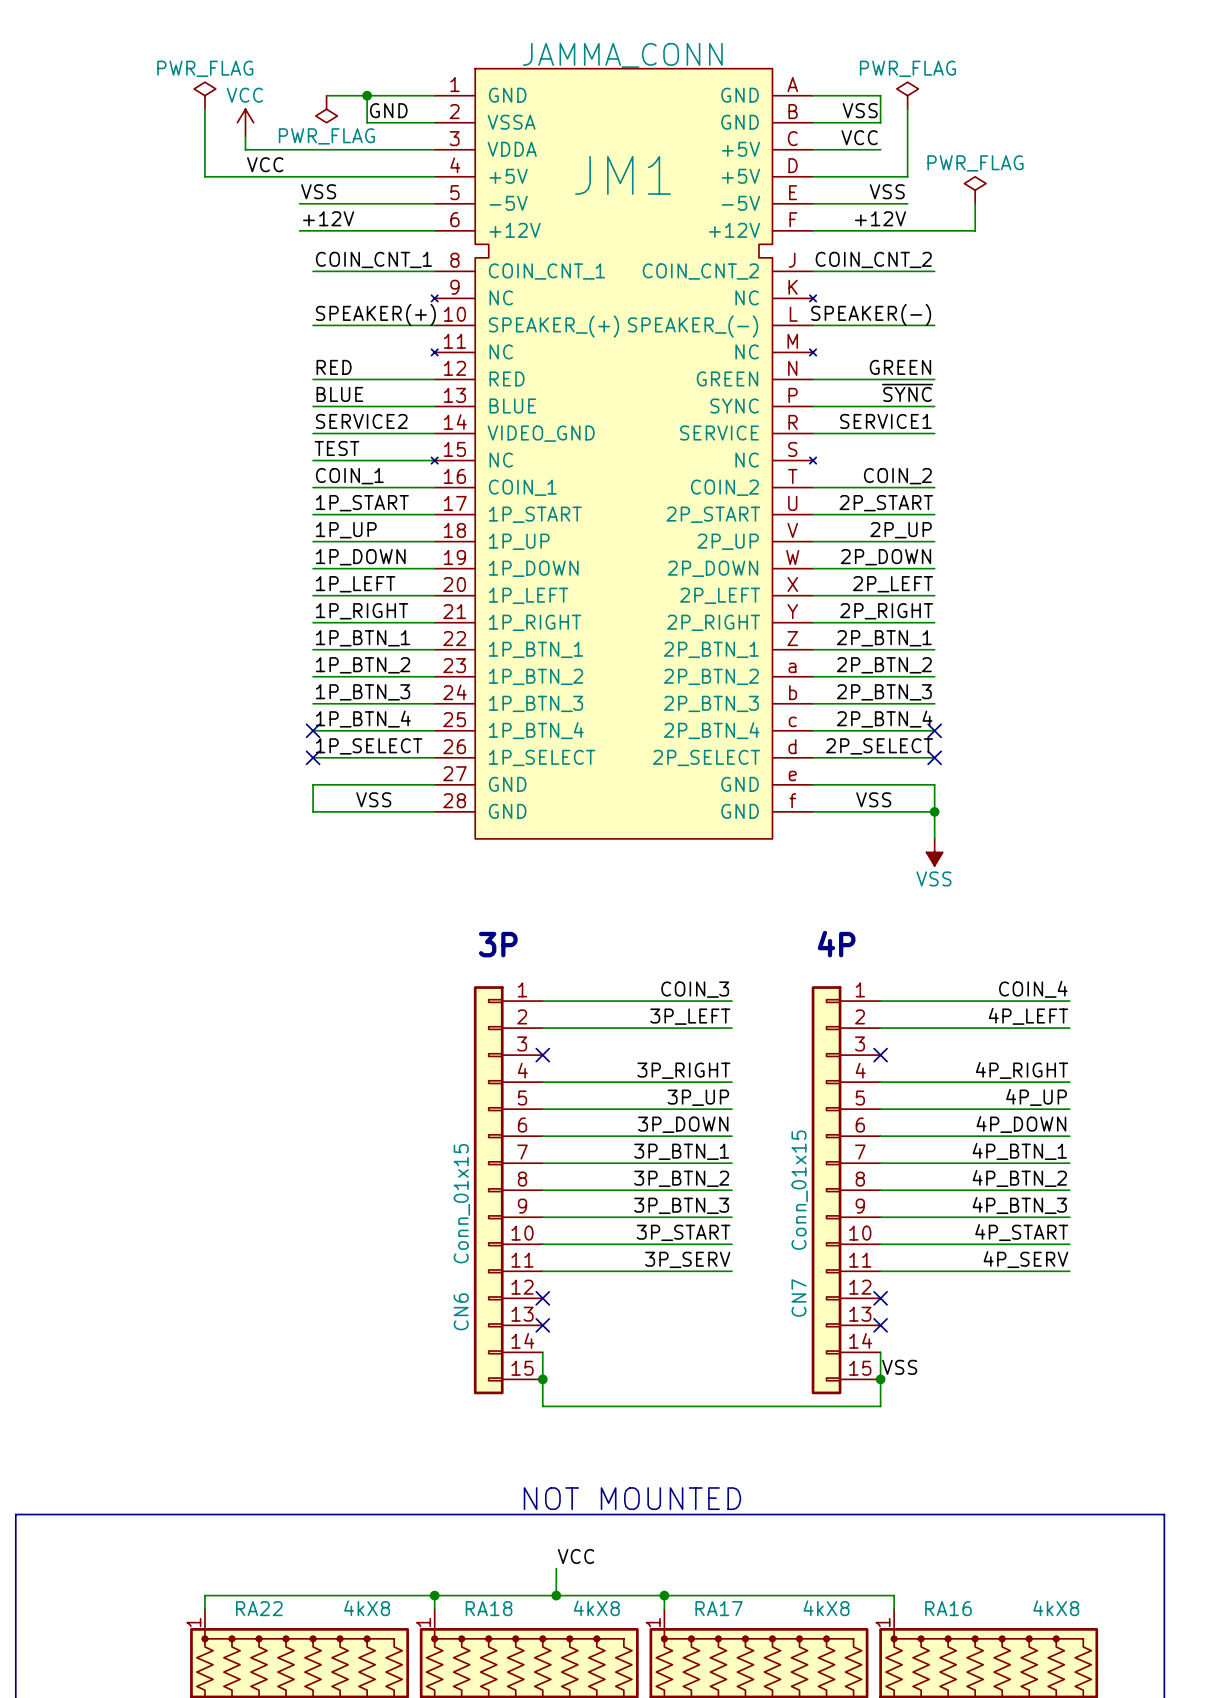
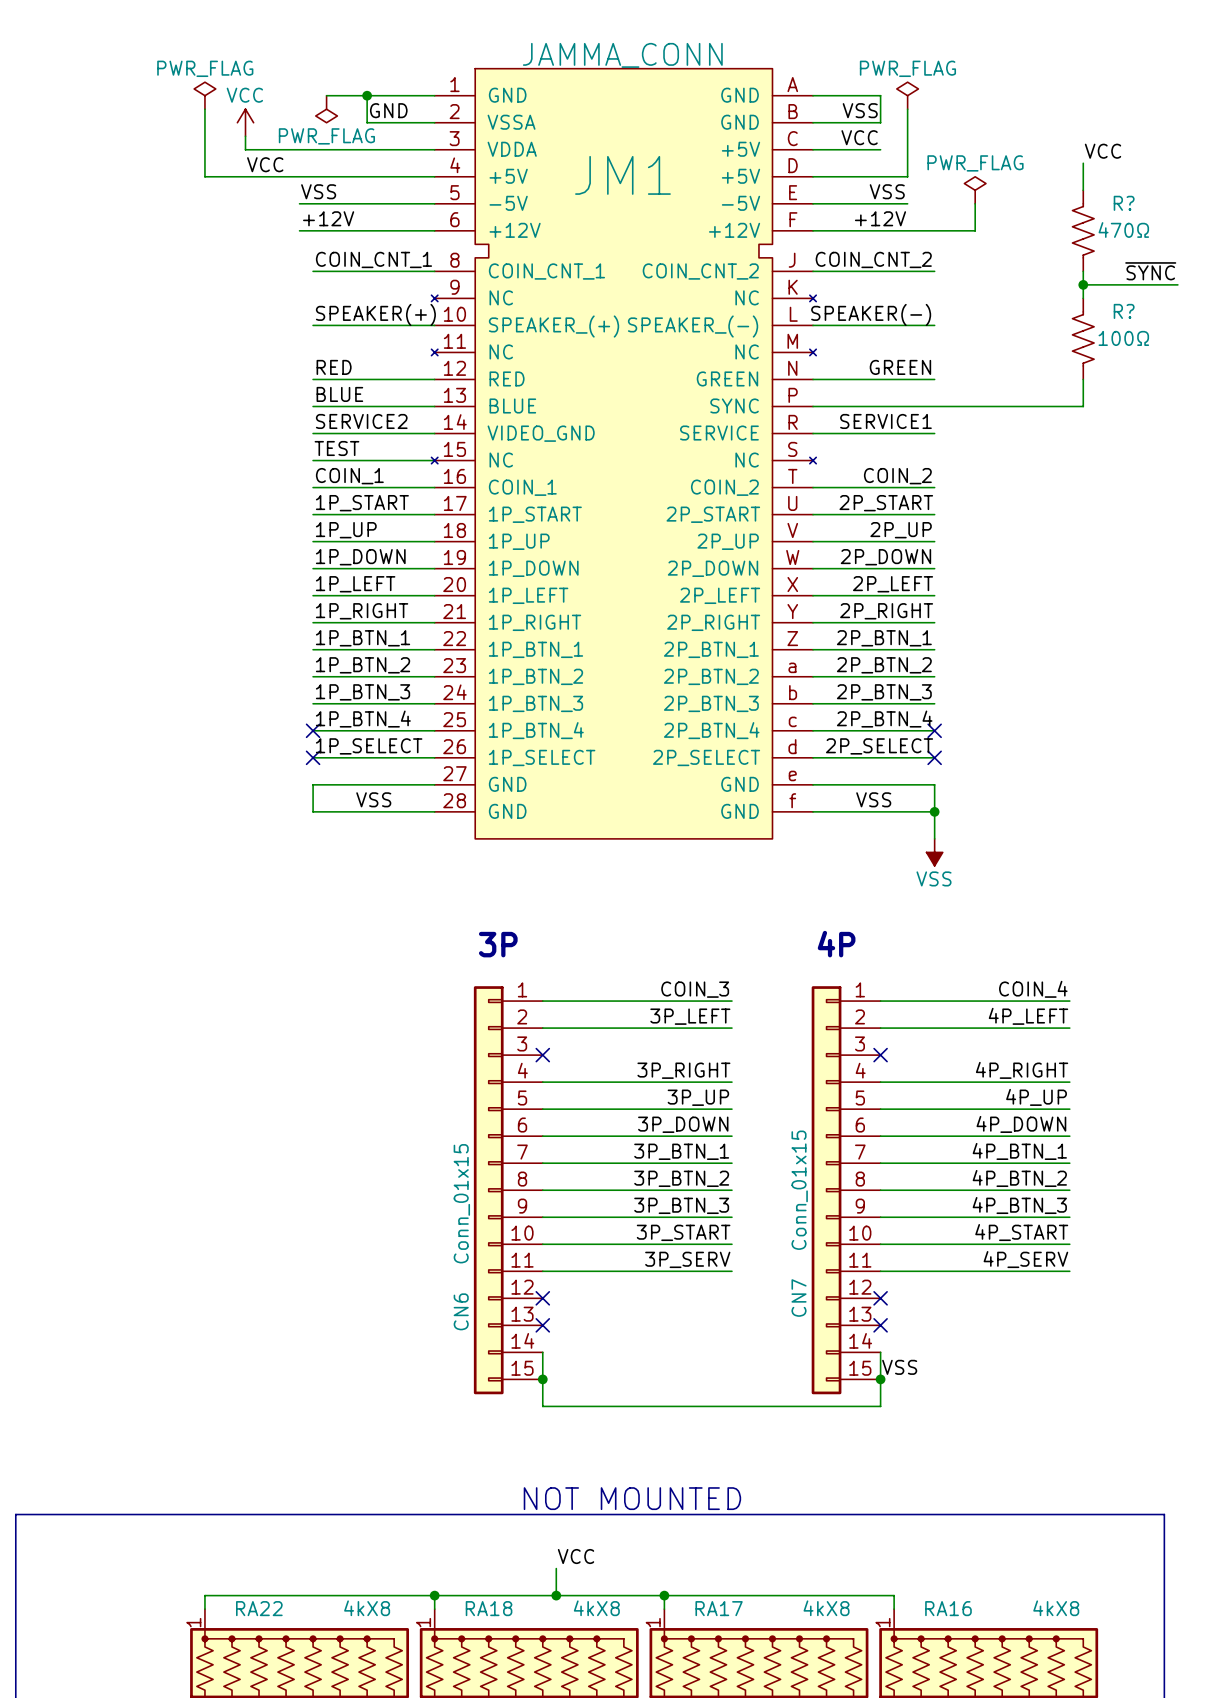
label: none -> VCC (1103, 151)
wire: none -> (1083, 163) (1083, 190)
R?: none -> 470Ω (1083, 230)
wire: none -> (1083, 271) (1083, 298)
label: none -> ~{SYNC} (1150, 271)
wire: none -> (1083, 284) (1177, 284)
junction: none -> (1083, 284)
R?: none -> 100Ω (1083, 338)
wire: none -> (1083, 379) (1083, 406) (934, 406)
label: ~{SYNC} (907, 392) -> none

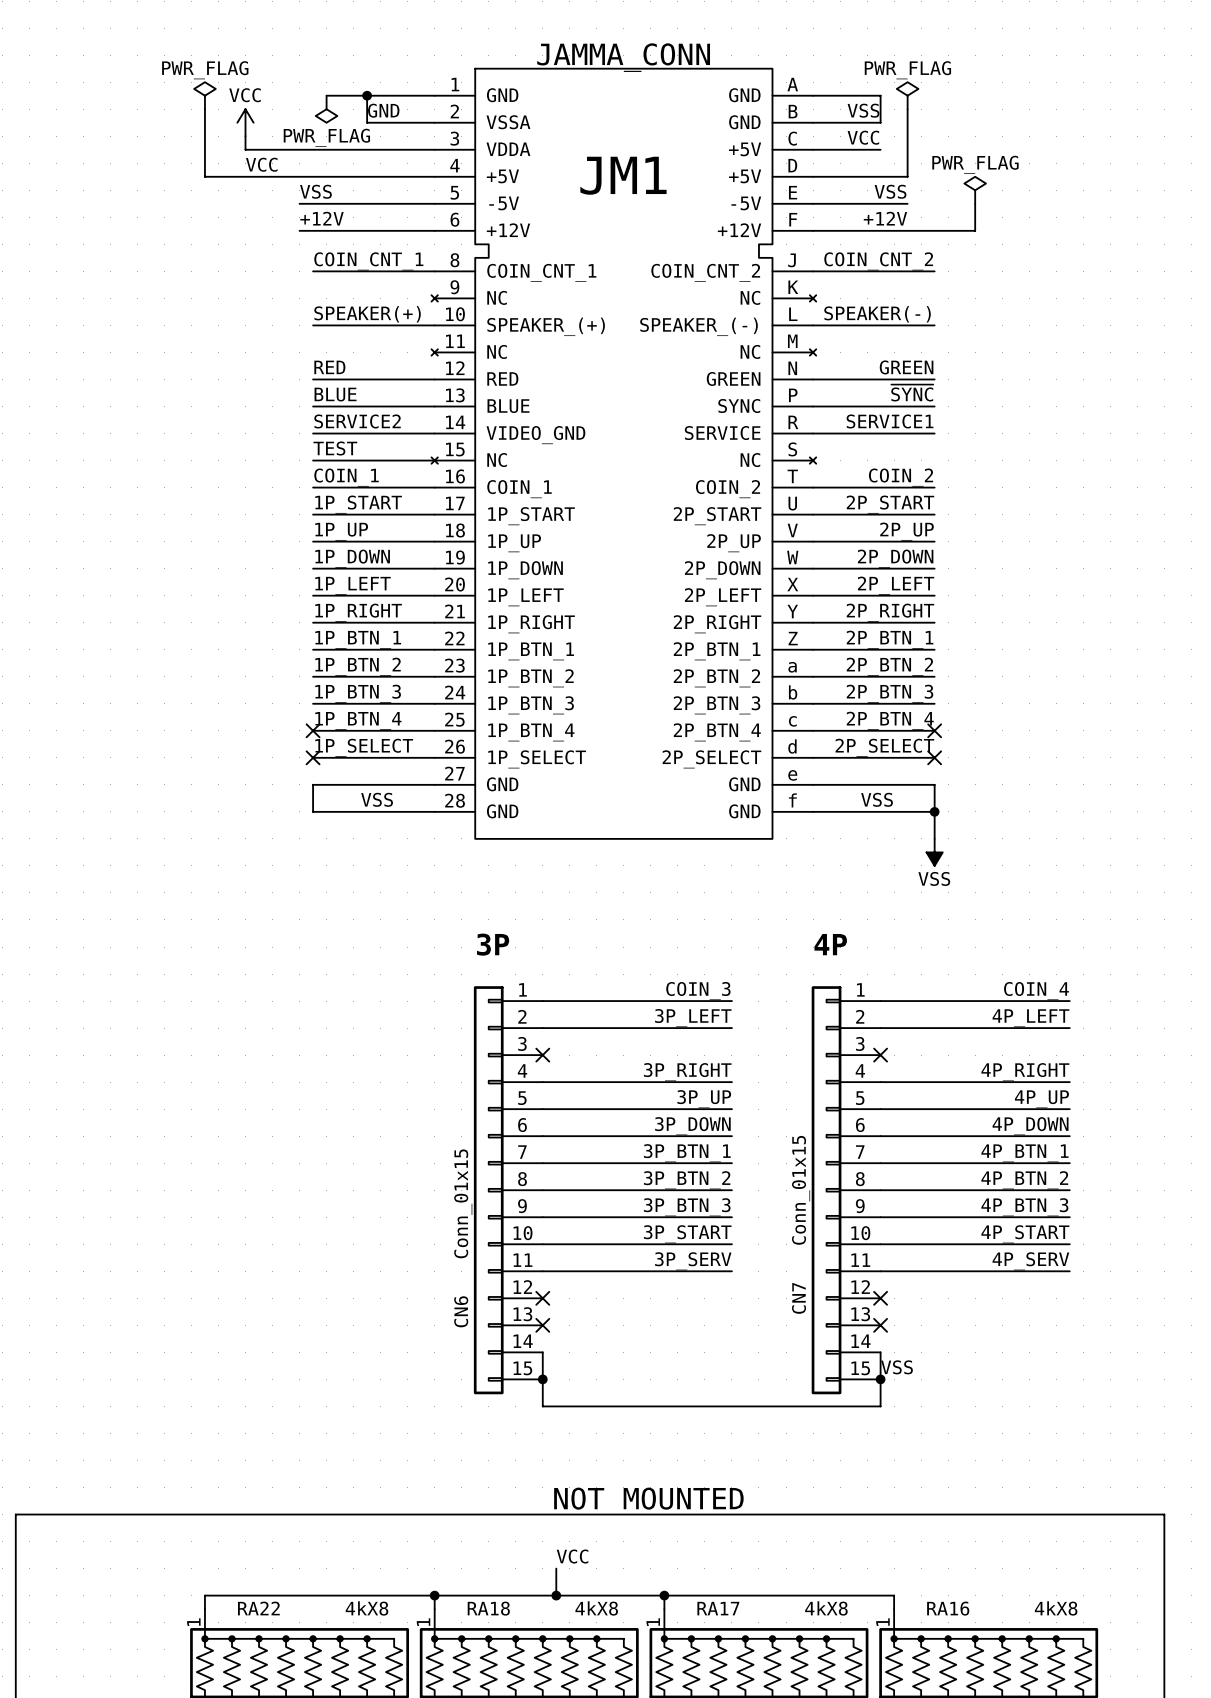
label: VCC (1103, 151) -> none
wire: (1083, 163) (1083, 190) -> none
R?: 470Ω (1083, 230) -> none
wire: (1083, 271) (1083, 298) -> none
label: ~{SYNC} (1150, 271) -> none
wire: (1083, 284) (1177, 284) -> none
junction: (1083, 284) -> none
R?: 100Ω (1083, 338) -> none
wire: (1083, 379) (1083, 406) (934, 406) -> none
label: none -> ~{SYNC} (912, 393)

